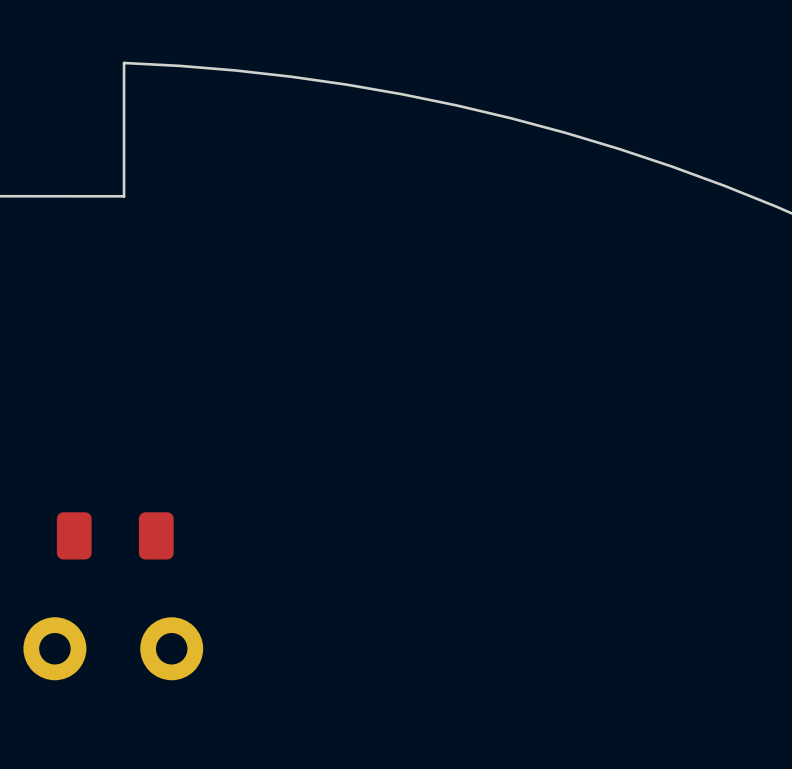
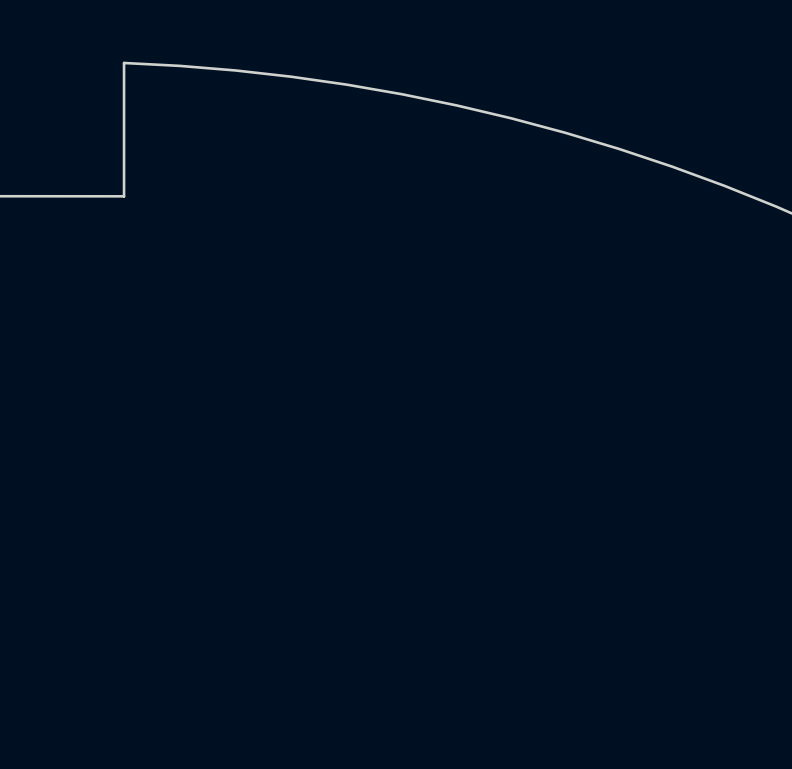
part: (115, 535) -> none
part: (54, 648) -> none
part: (171, 648) -> none

